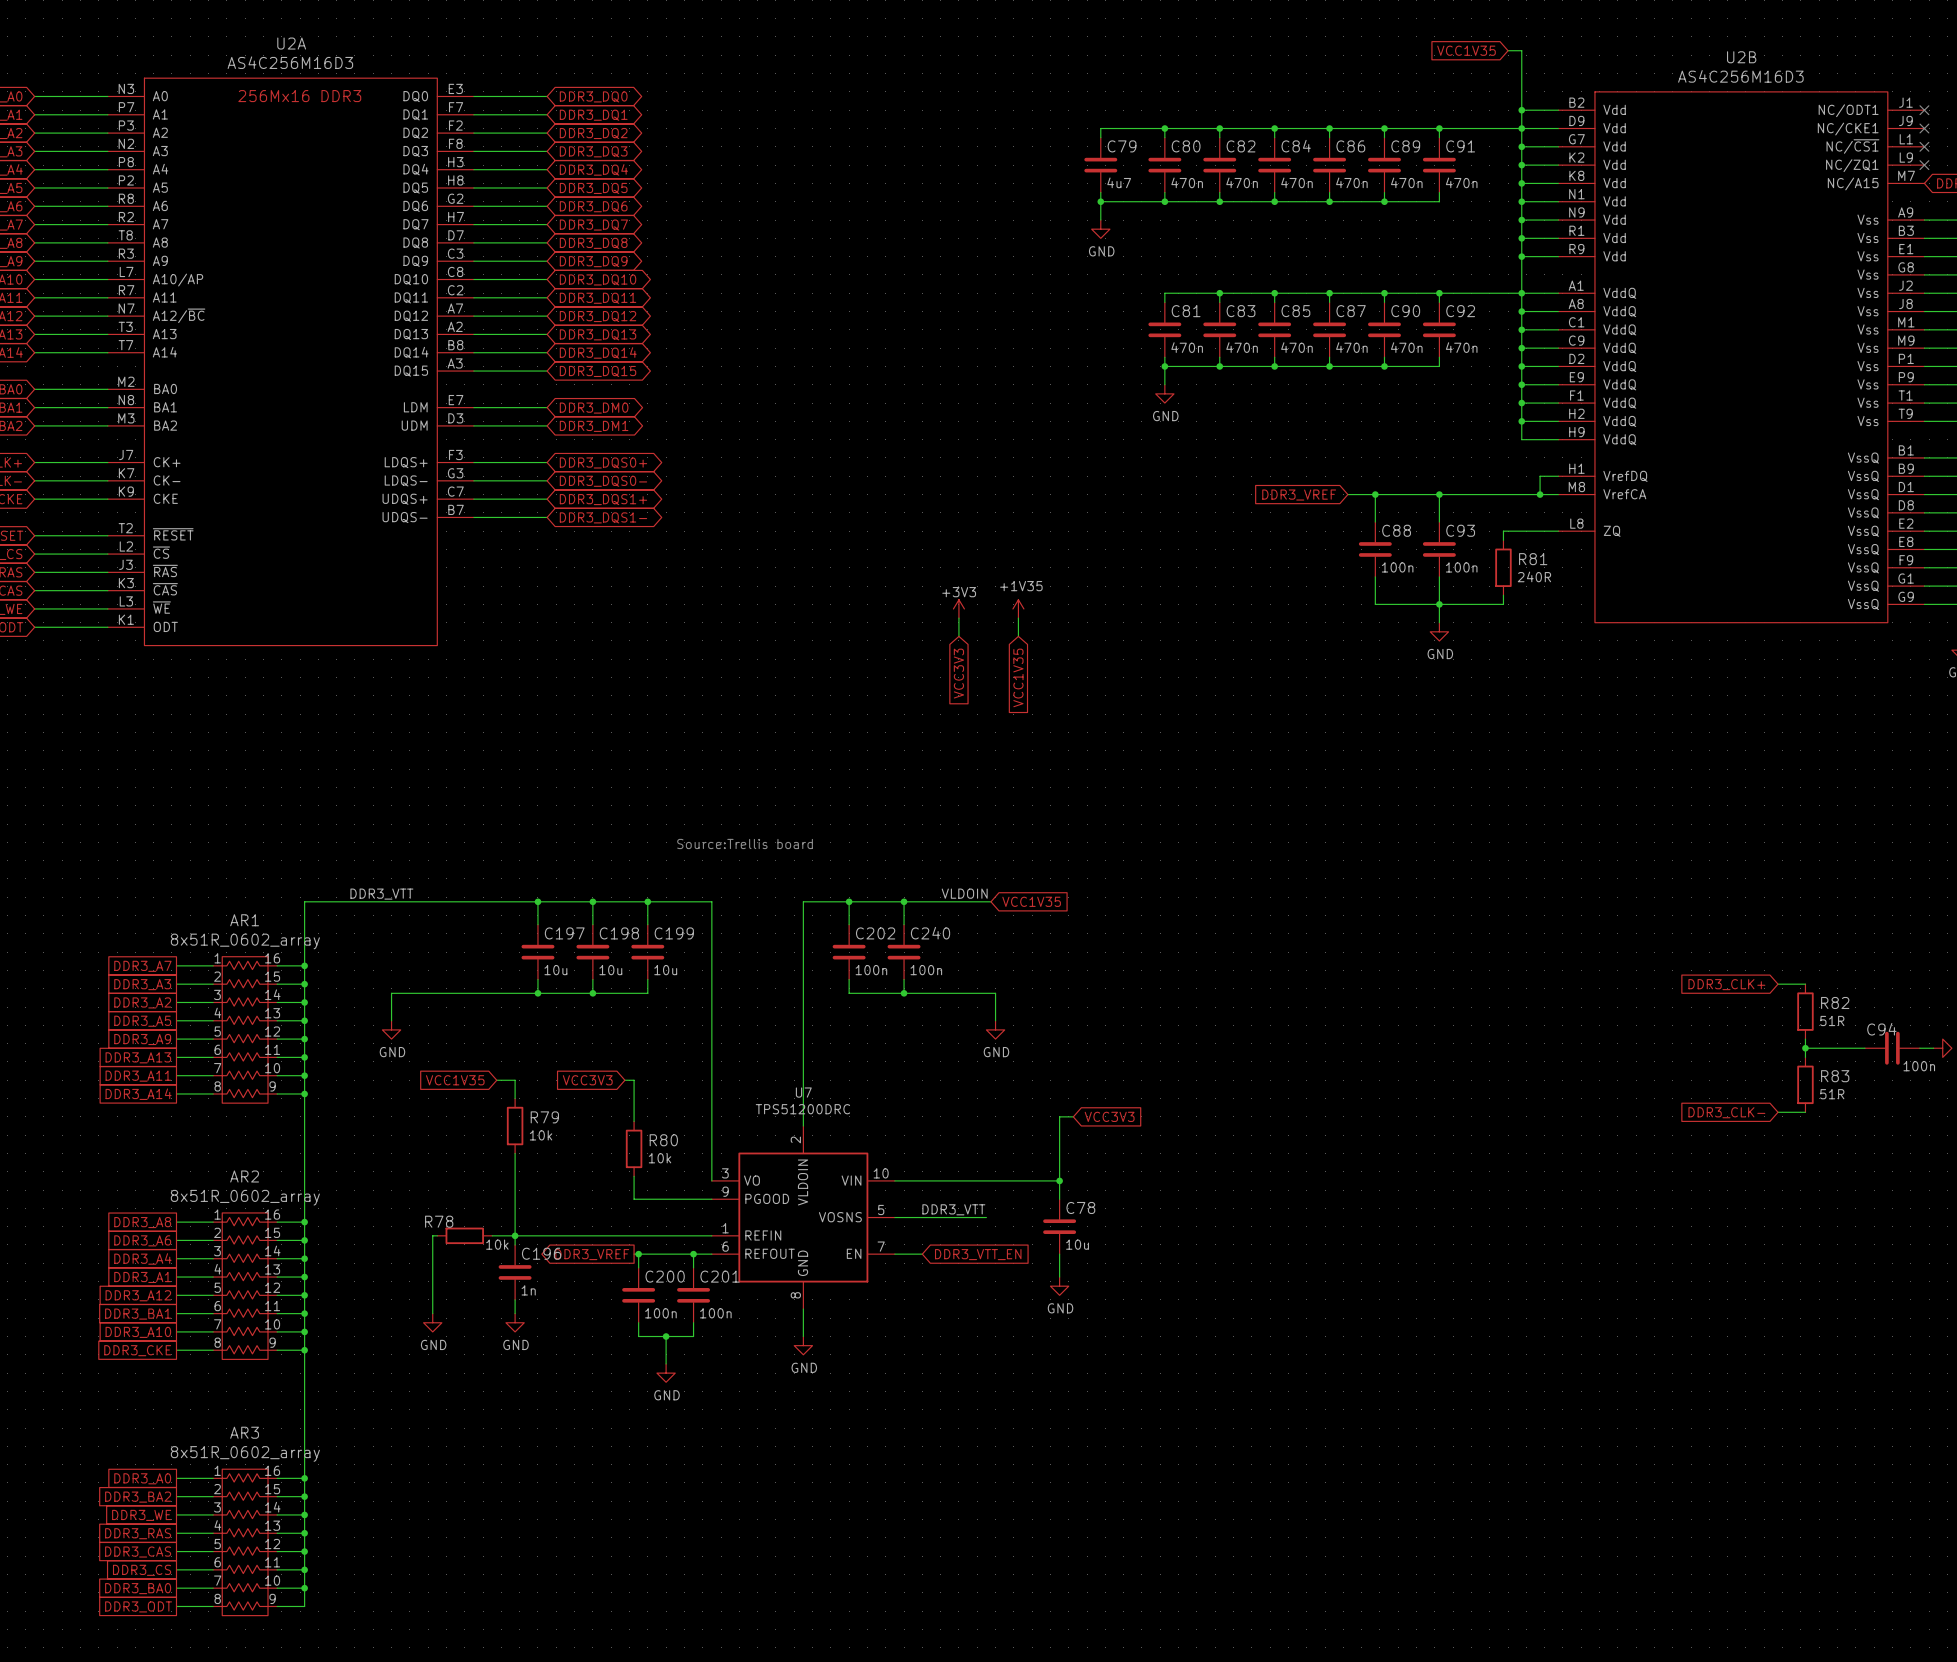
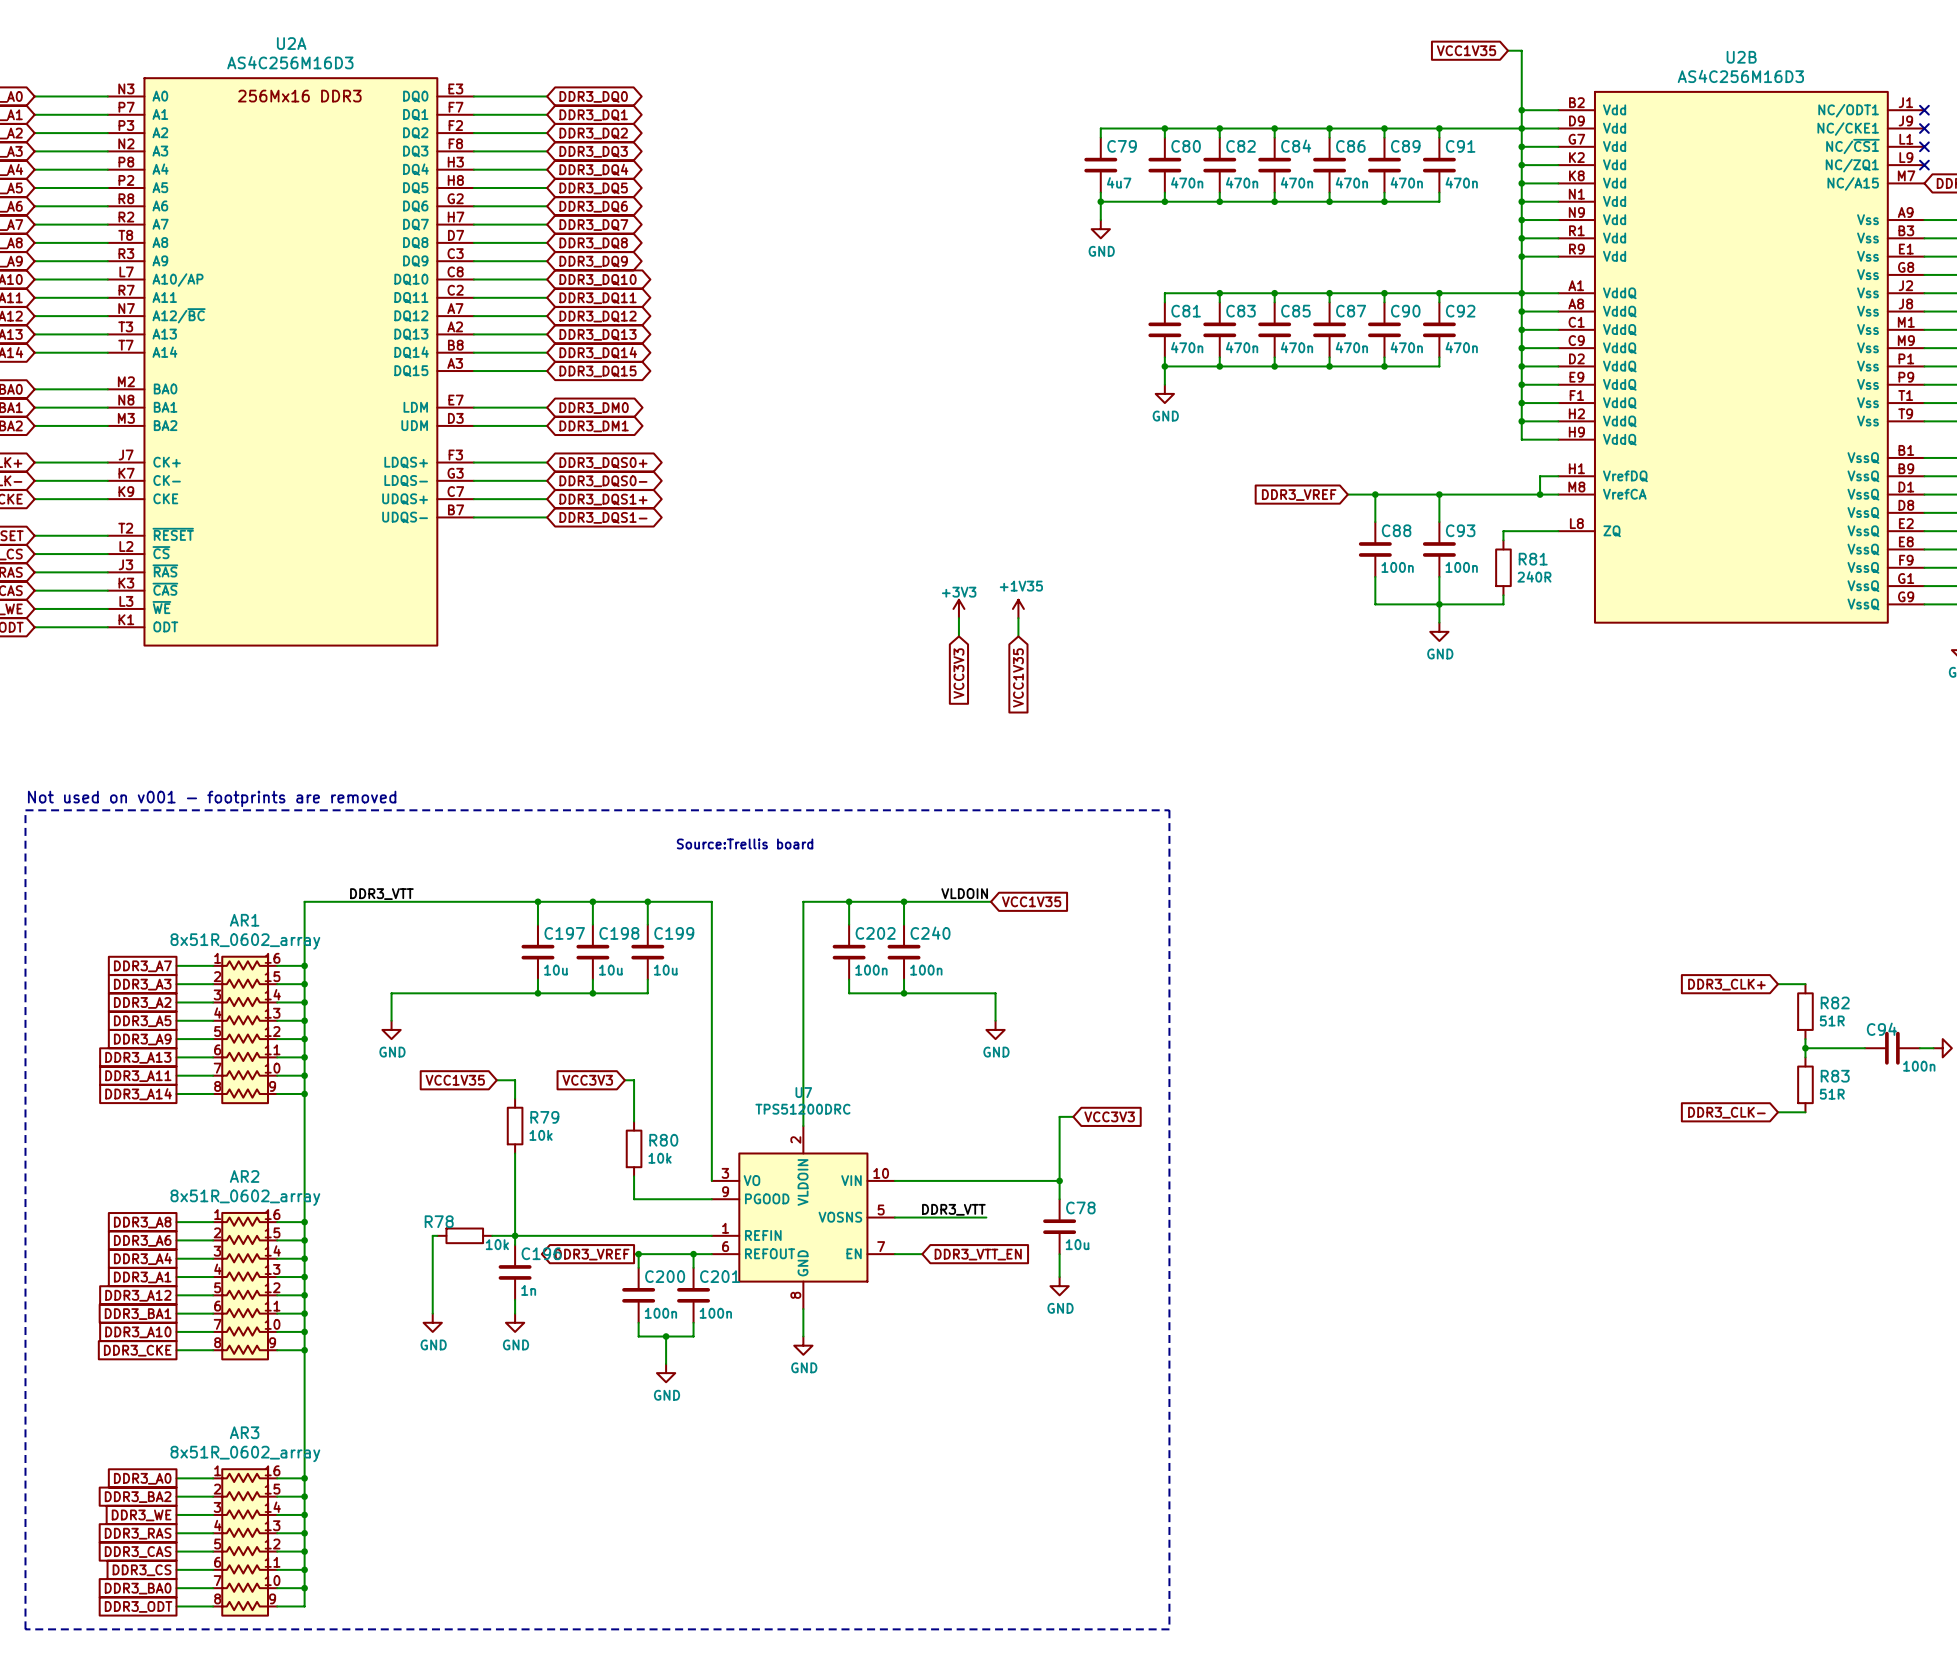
text: none -> Not used on v001 - footprints are removed (212, 798)
line: none -> (25, 810) (1169, 810) (1169, 1629) (25, 1629) (25, 810)

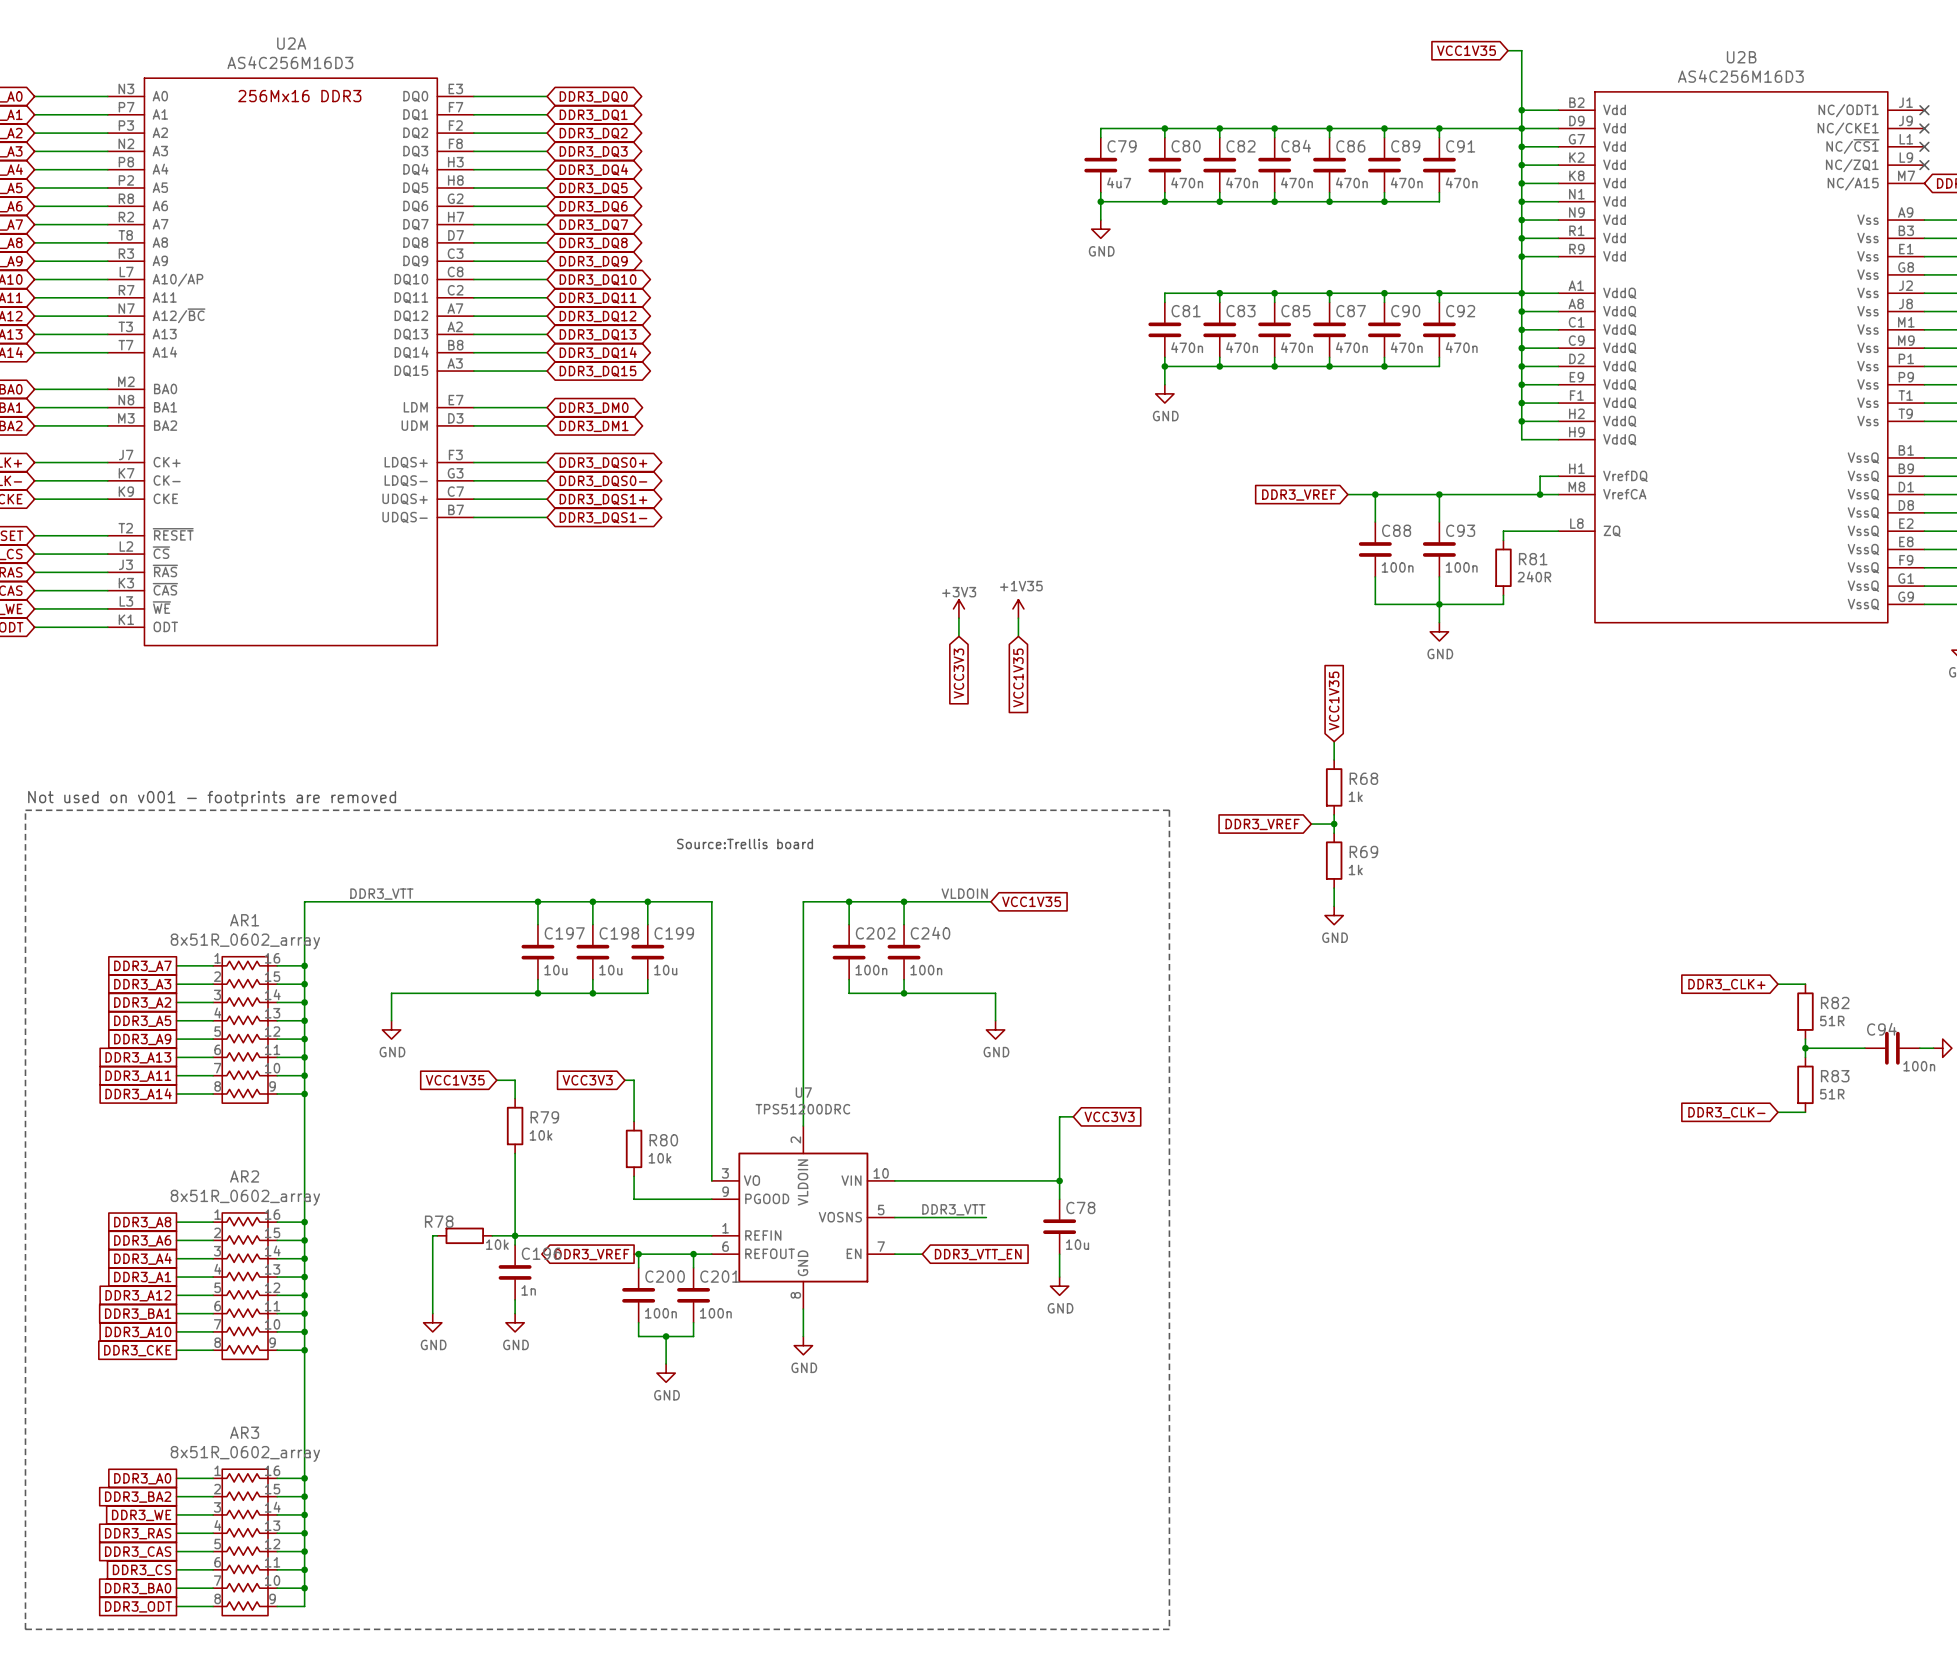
global label: none -> VCC1V35 (1334, 701)
wire: none -> (1334, 741) (1334, 759)
R68: none -> (1334, 787)
wire: none -> (1334, 814) (1334, 833)
global label: none -> DDR3_VREF (1262, 824)
wire: none -> (1311, 824) (1334, 824)
junction: none -> (1334, 824)
R69: none -> (1334, 860)
wire: none -> (1334, 888) (1334, 906)
power symbol: none -> GND (1334, 915)

